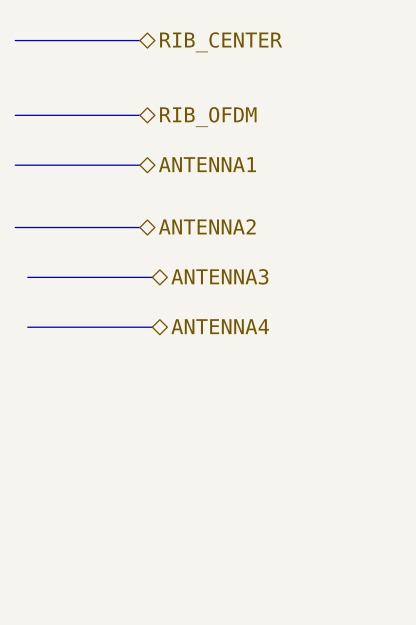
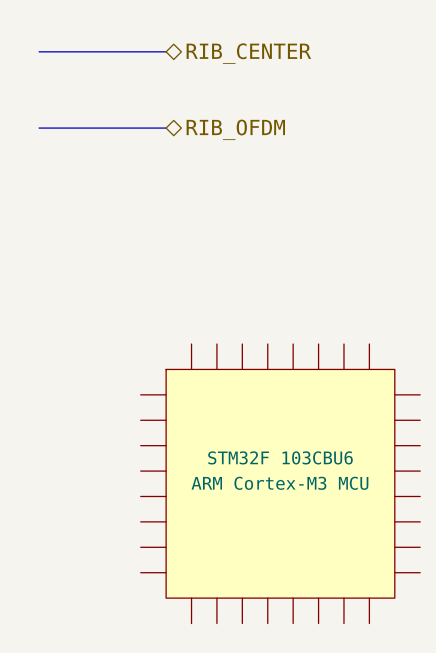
hierarchical label: ANTENNA1 (207, 164) -> none
bus: (15, 165) (139, 165) -> none
hierarchical label: ANTENNA2 (207, 226) -> none
bus: (15, 227) (139, 227) -> none
hierarchical label: ANTENNA3 (219, 276) -> none
bus: (27, 277) (152, 277) -> none
hierarchical label: ANTENNA4 (220, 326) -> none
bus: (27, 327) (152, 327) -> none
part: none -> STM32F 103CBU6 (280, 483)

